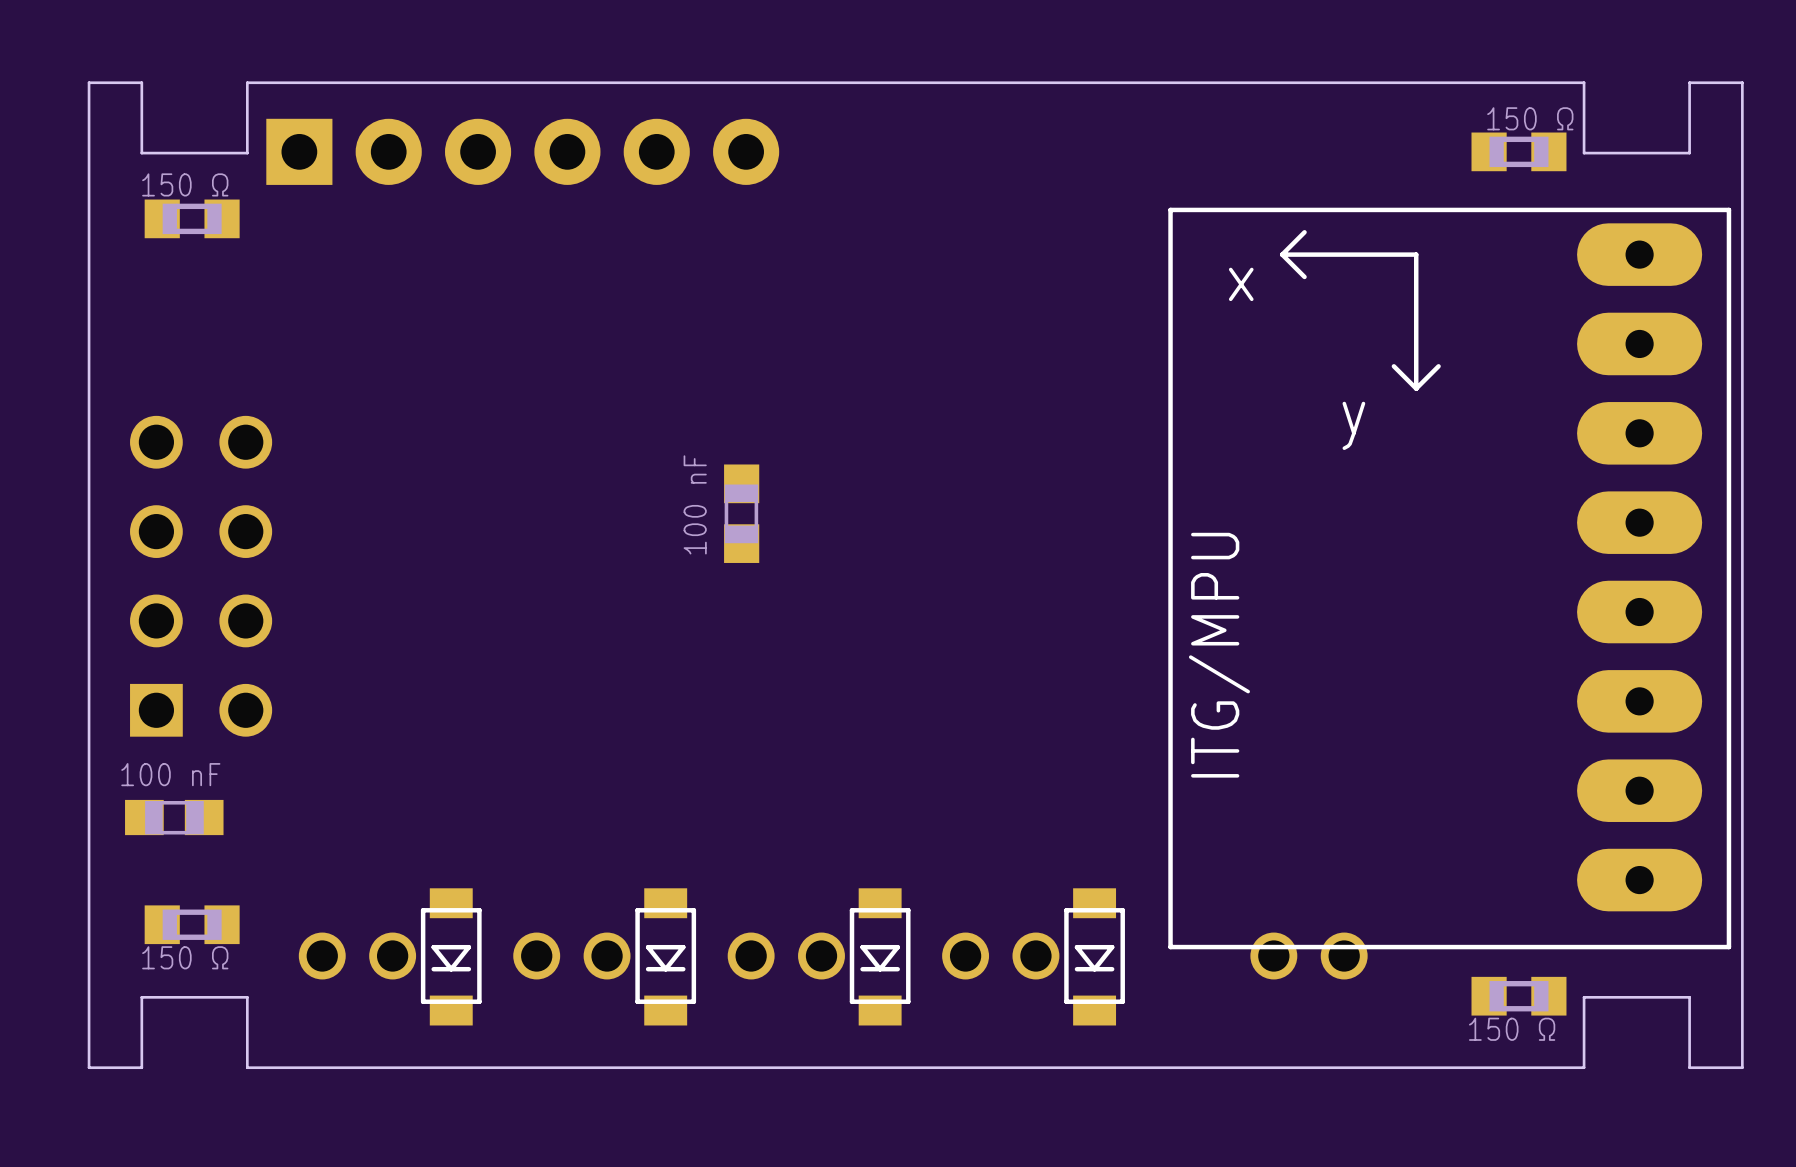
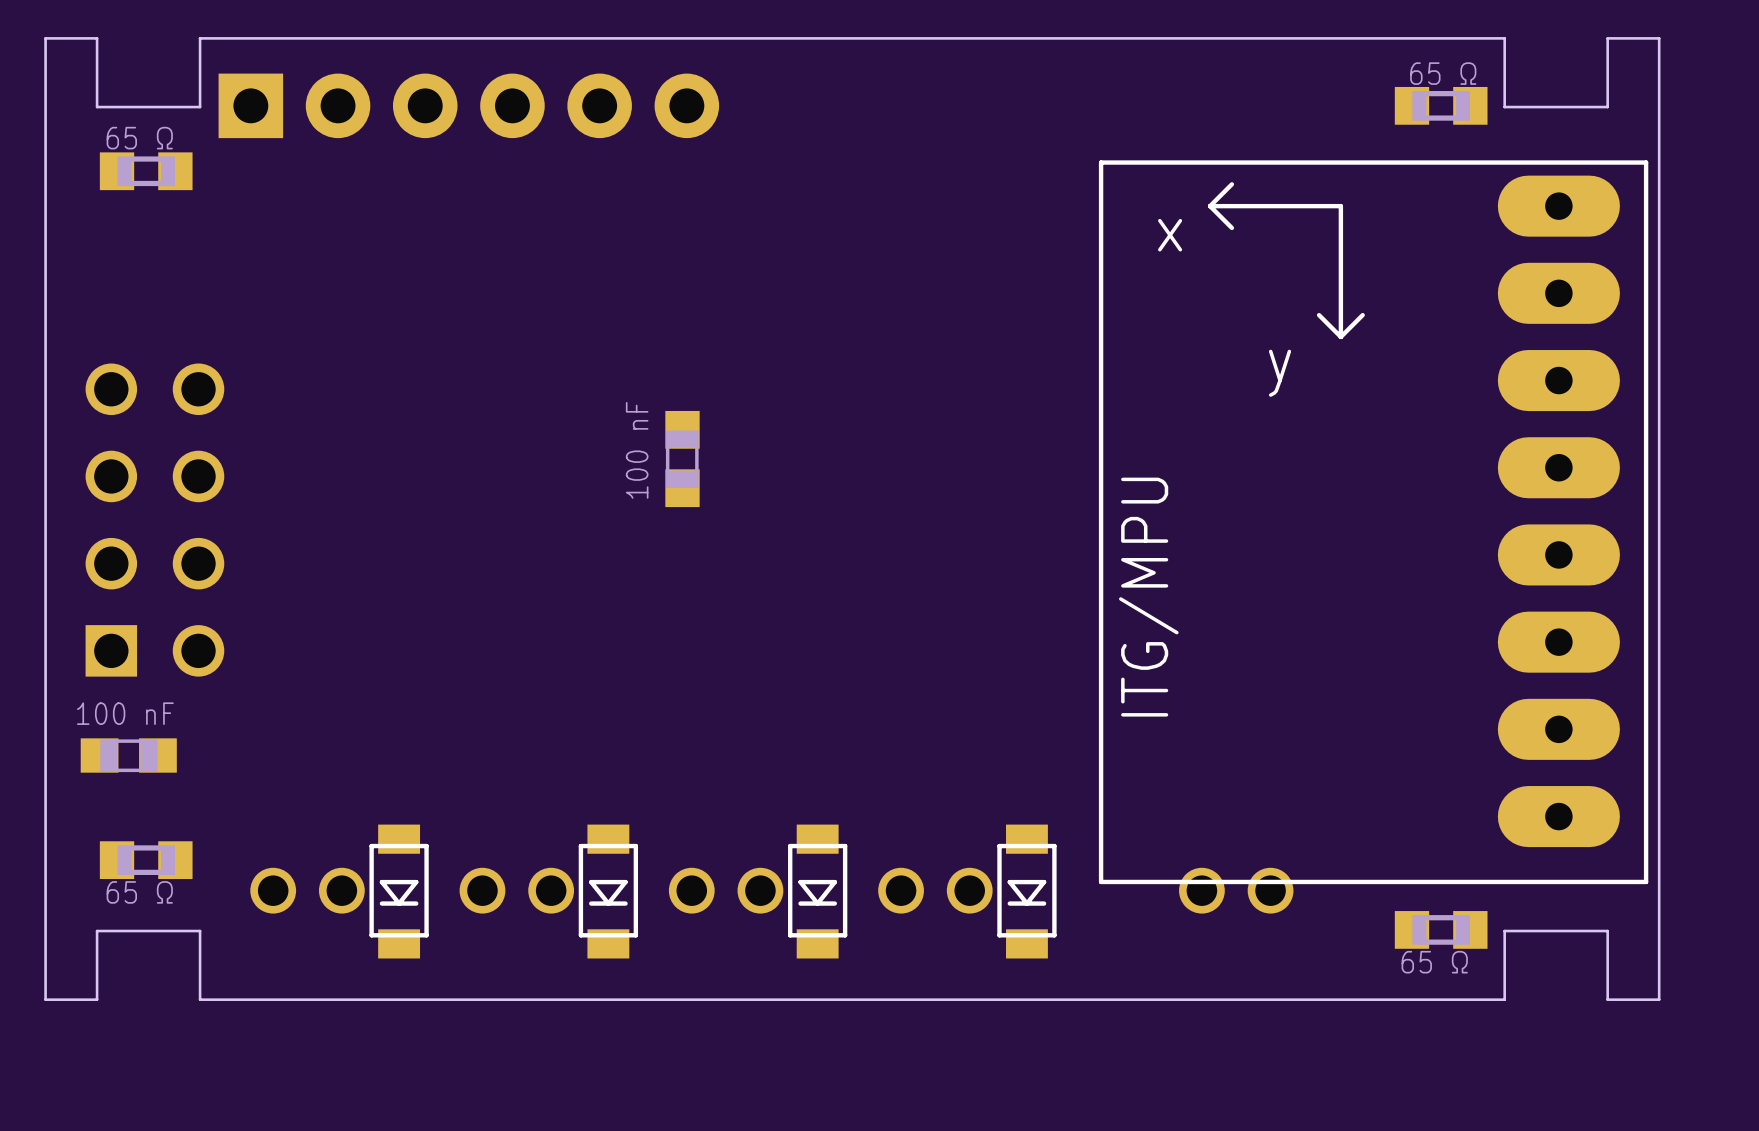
part value: 150 Ω (1530, 118) -> 65 Ω (1443, 73)
part value: 150 Ω (185, 184) -> 65 Ω (139, 138)
part value: 150 Ω (185, 957) -> 65 Ω (139, 892)
part value: 150 Ω (1512, 1029) -> 65 Ω (1434, 962)

